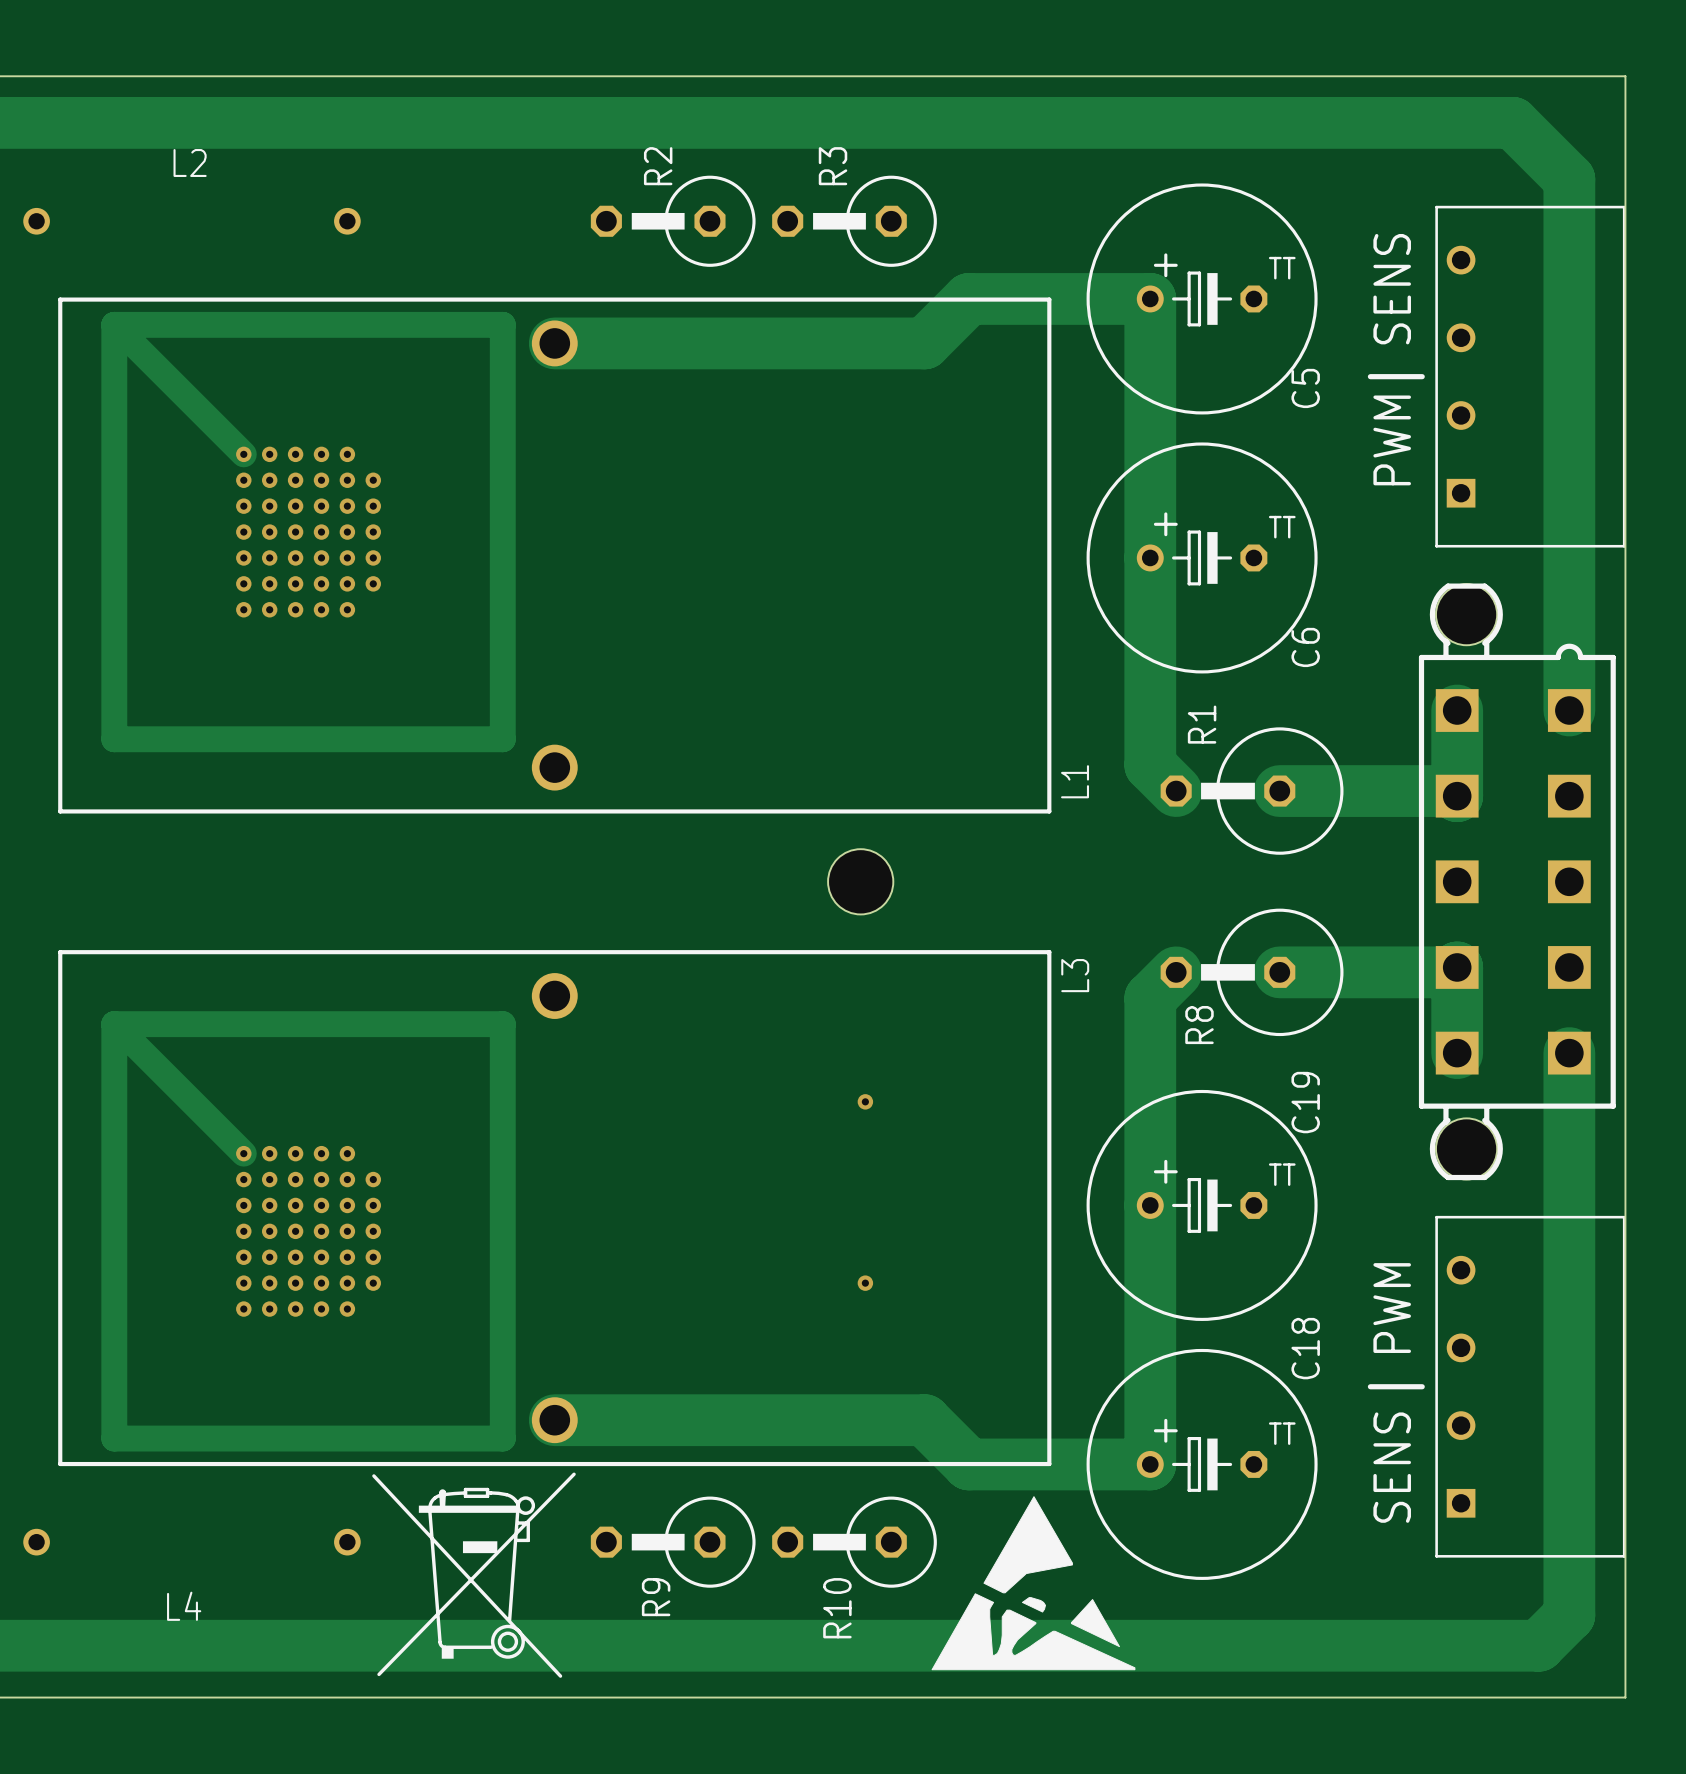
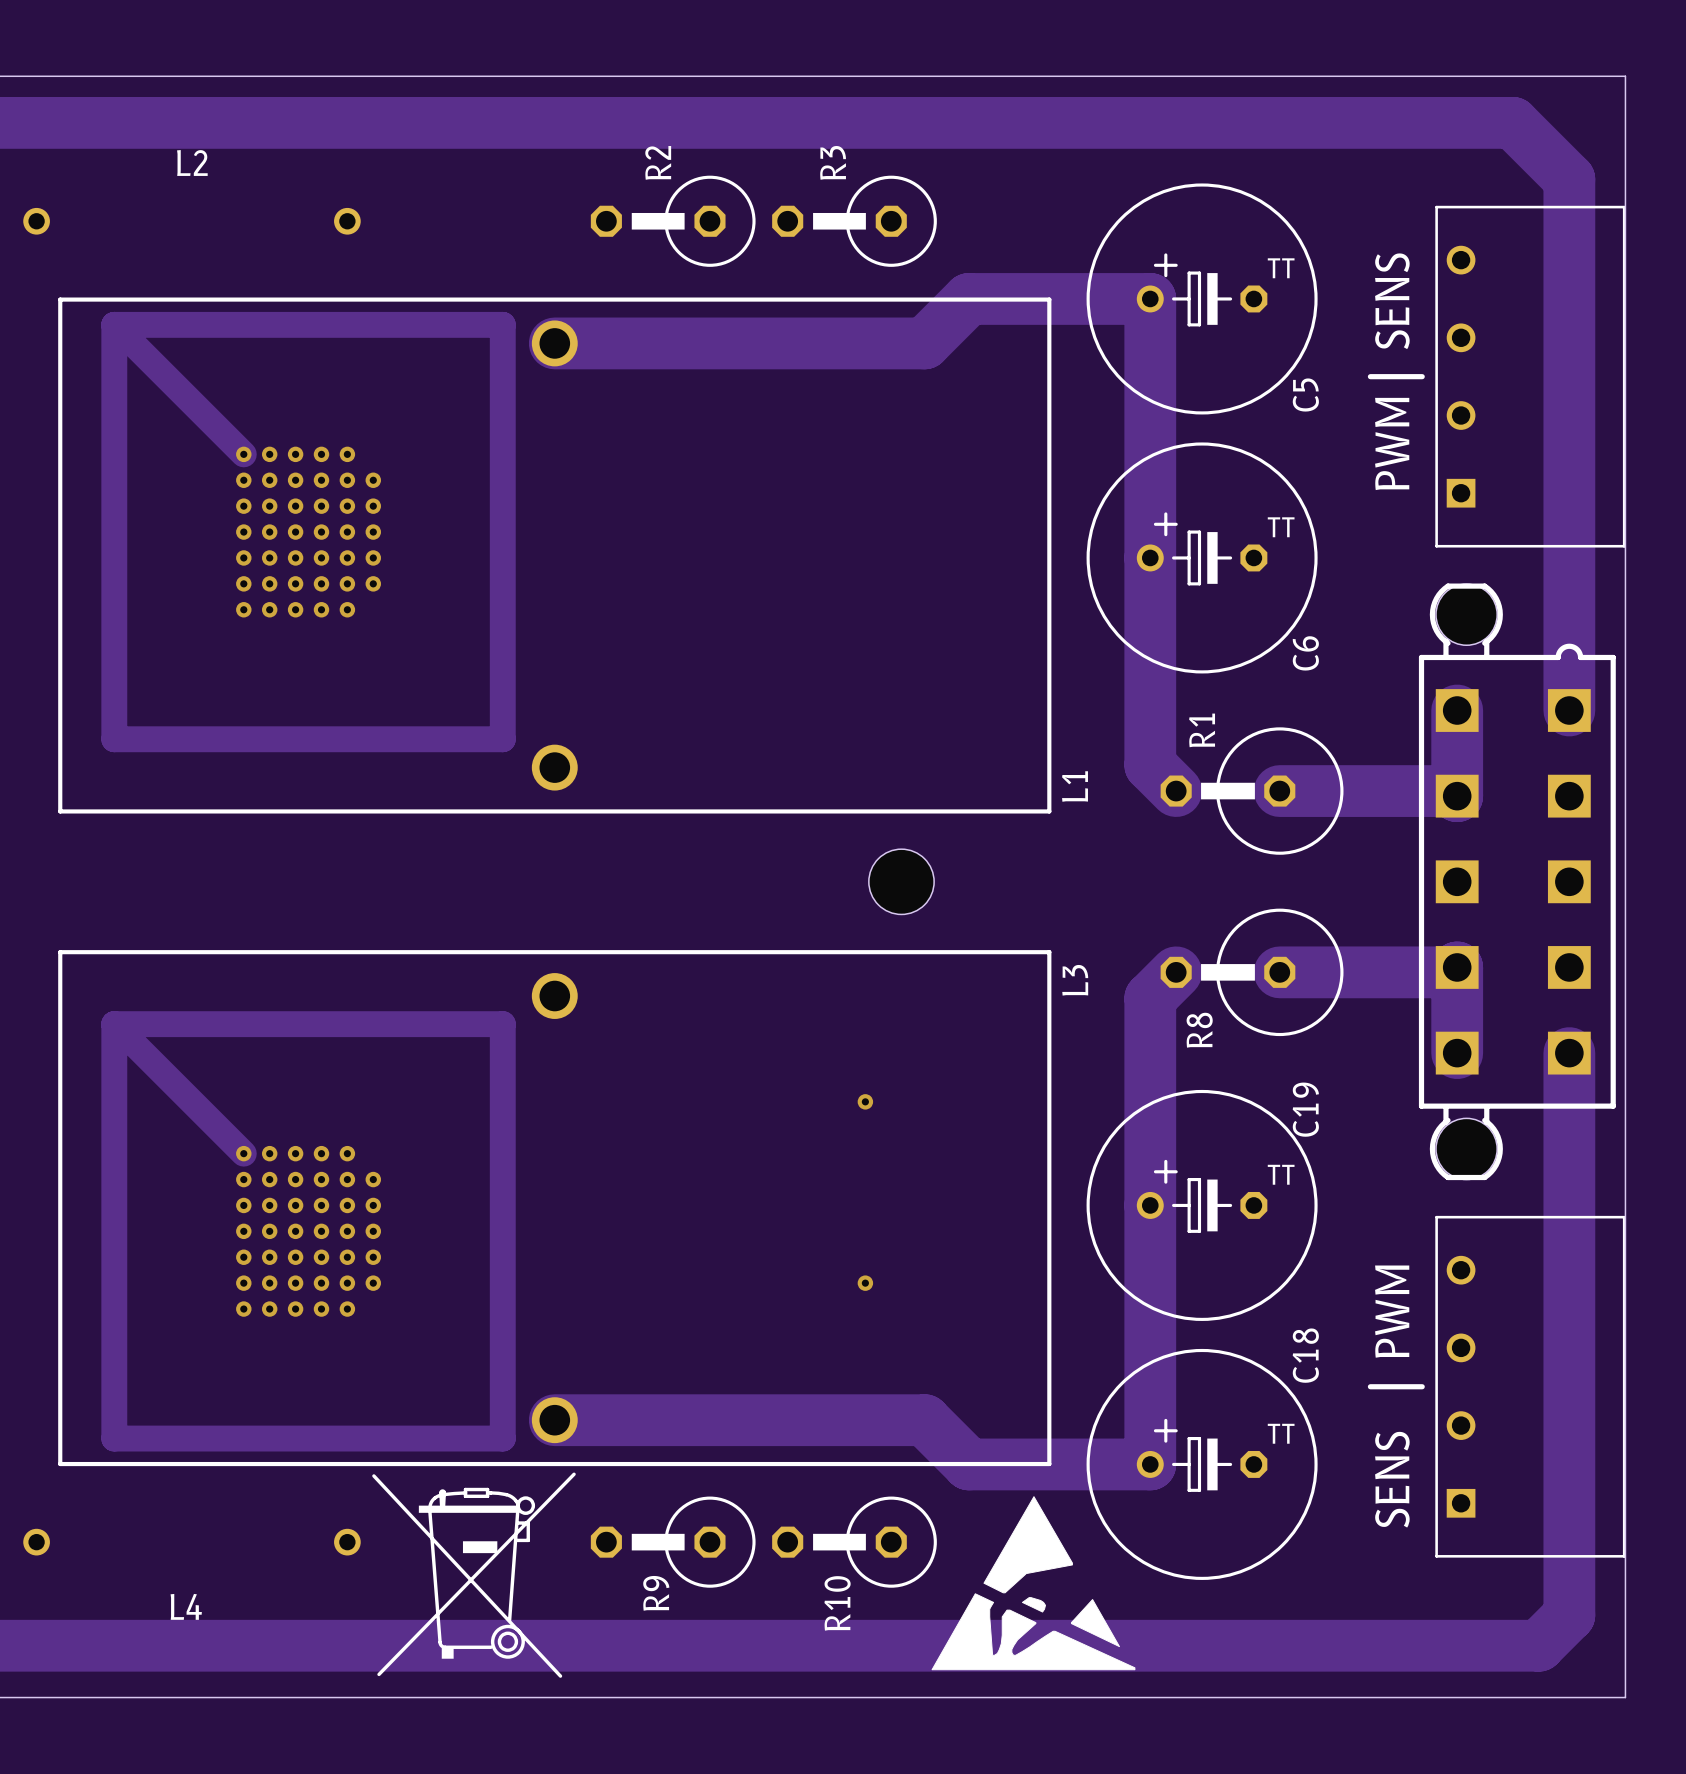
hole position: (860, 881) -> (901, 881)

